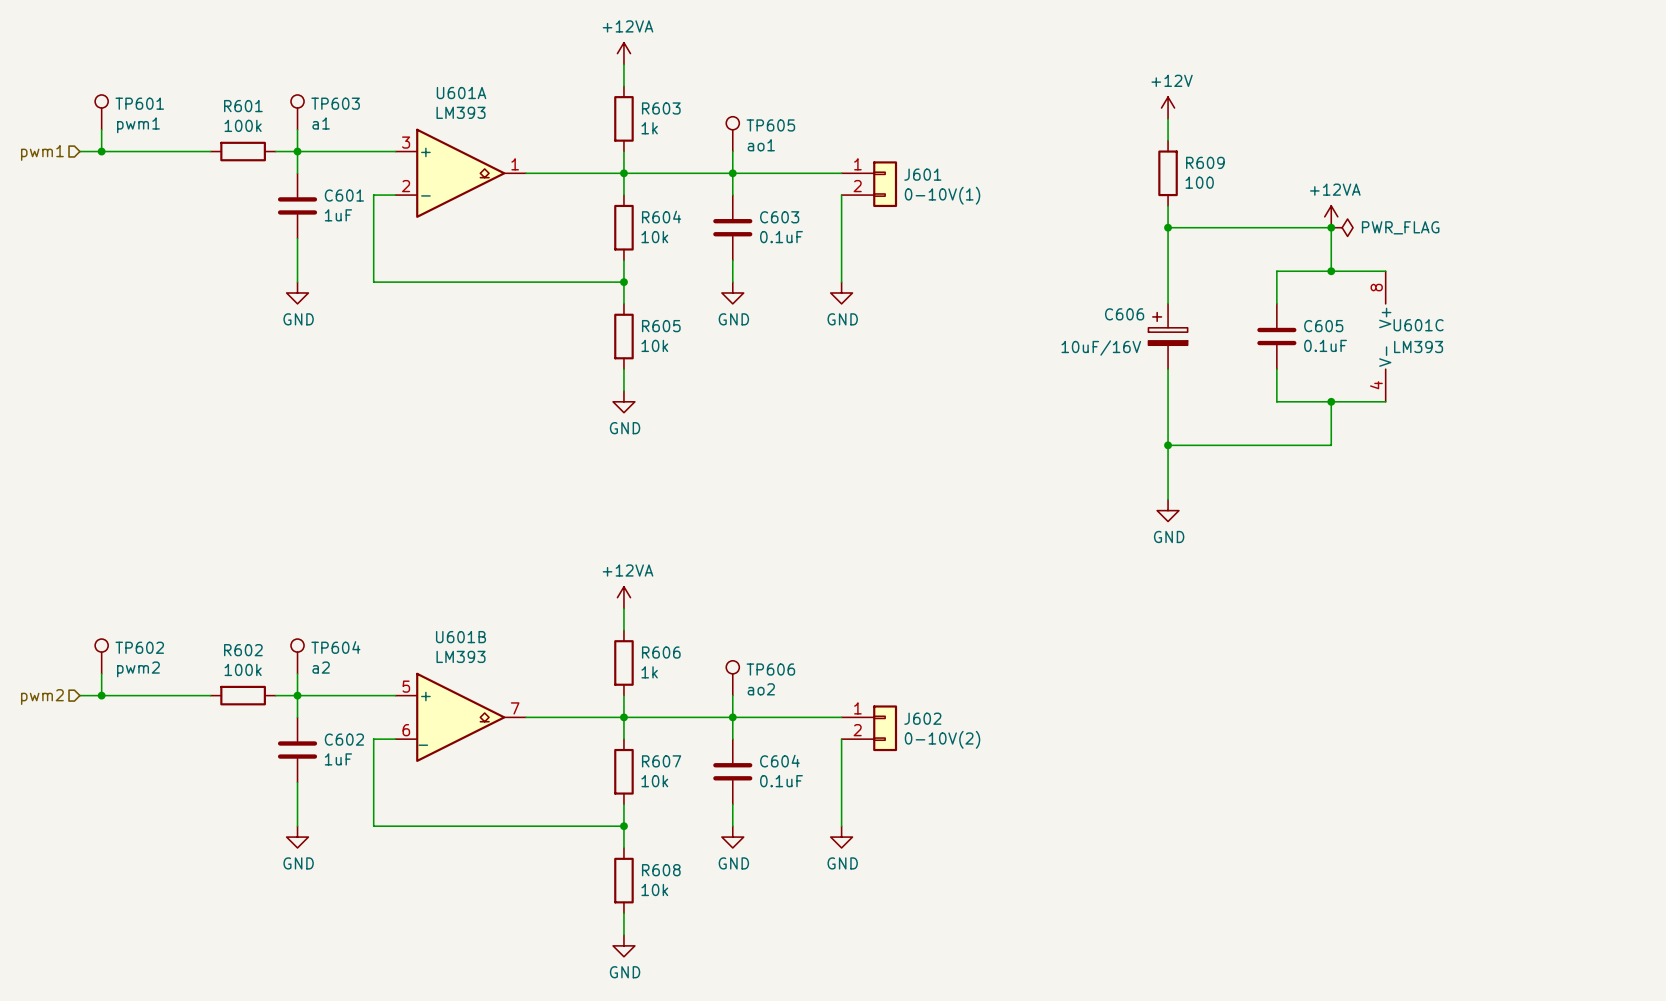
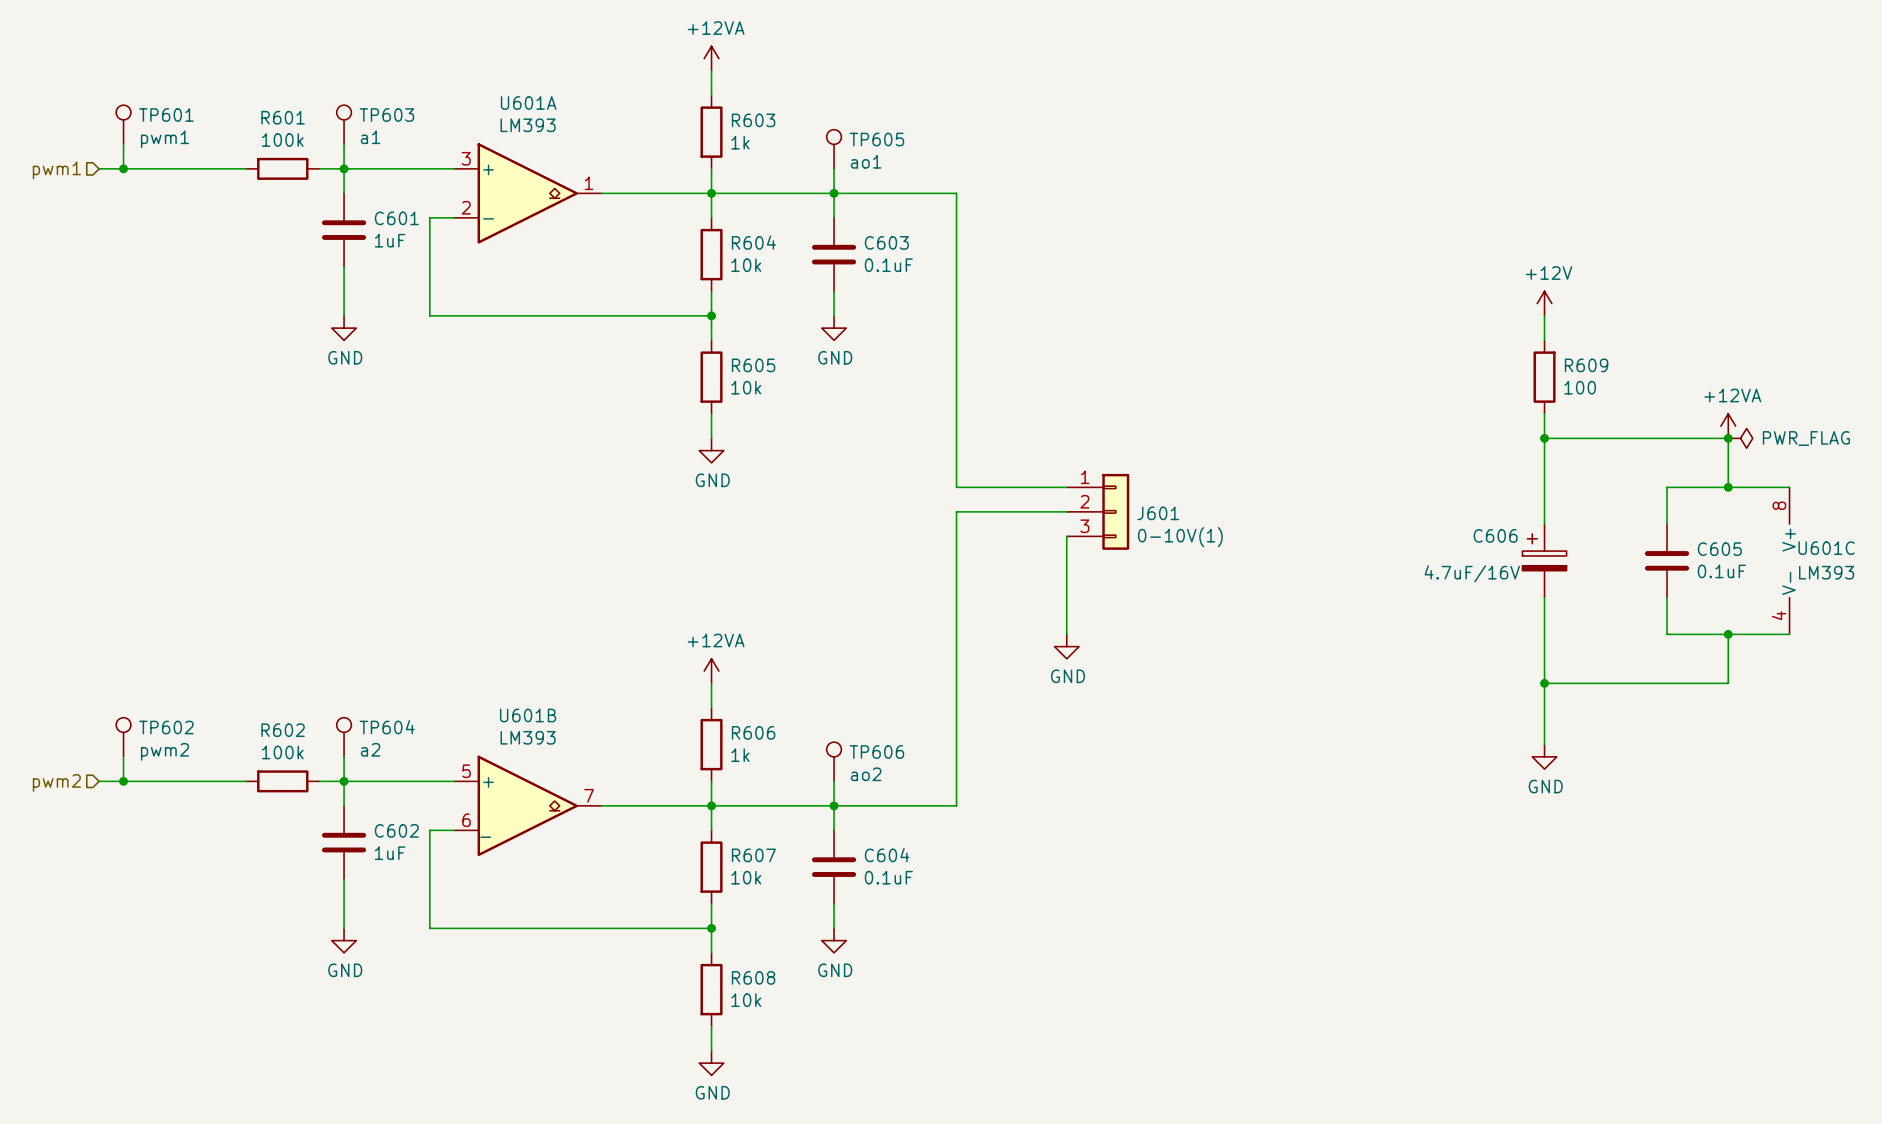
power symbol: +12V (1168, 108) -> none
wire: (1168, 118) (1168, 140) -> none
J601 symbol: [841, 161, 898, 208] -> [1066, 473, 1130, 550]
wire: none -> (956, 193) (956, 217)
R609 position: (1168, 173) -> (1544, 377)
wire: (1168, 205) (1168, 303) -> none
power symbol: +12VA (1331, 216) -> none
wire: (1168, 227) (1331, 227) (1331, 271) -> none
junction: (1168, 227) -> none
junction: (1331, 227) -> none
power symbol: PWR_FLAG (1342, 227) -> none
junction: (1331, 271) -> none
power symbol: none -> +12V (1544, 303)
wire: (1385, 271) (1276, 271) (1276, 303) -> none
wire: none -> (956, 315) (956, 487) (1066, 487)
wire: none -> (1544, 315) (1544, 340)
power symbol: GND (841, 293) -> none
C606 position: (1168, 336) -> (1544, 560)
C605 position: (1276, 336) -> (1667, 560)
U601C position: (1385, 336) -> (1789, 560)
C606 value: 10uF/16V (1101, 348) -> 4.7uF/16V (1472, 573)
wire: (1168, 369) (1168, 499) -> none
wire: (1276, 369) (1276, 401) (1385, 401) -> none
wire: none -> (1544, 413) (1544, 524)
power symbol: none -> +12VA (1728, 426)
wire: none -> (1544, 438) (1728, 438) (1728, 487)
junction: none -> (1728, 438)
power symbol: none -> PWR_FLAG (1740, 438)
wire: (1331, 401) (1331, 445) (1168, 445) -> none
junction position: (1331, 401) -> (1544, 438)
junction: none -> (1728, 487)
wire: none -> (1789, 487) (1667, 487) (1667, 524)
junction: (1168, 445) -> none
wire: none -> (1066, 511) (956, 511) (956, 805)
wire: none -> (1066, 536) (1066, 634)
power symbol: GND (1168, 510) -> none
wire: none -> (1544, 597) (1544, 744)
wire: none -> (1667, 597) (1667, 634) (1789, 634)
wire: none -> (1728, 634) (1728, 683) (1544, 683)
junction: none -> (1728, 634)
power symbol: none -> GND (1066, 646)
junction: none -> (1544, 683)
power symbol: none -> GND (1544, 756)
J602: 0-10V(2) (869, 728) -> none
wire: (841, 739) (841, 826) -> none
power symbol: GND (841, 837) -> none

